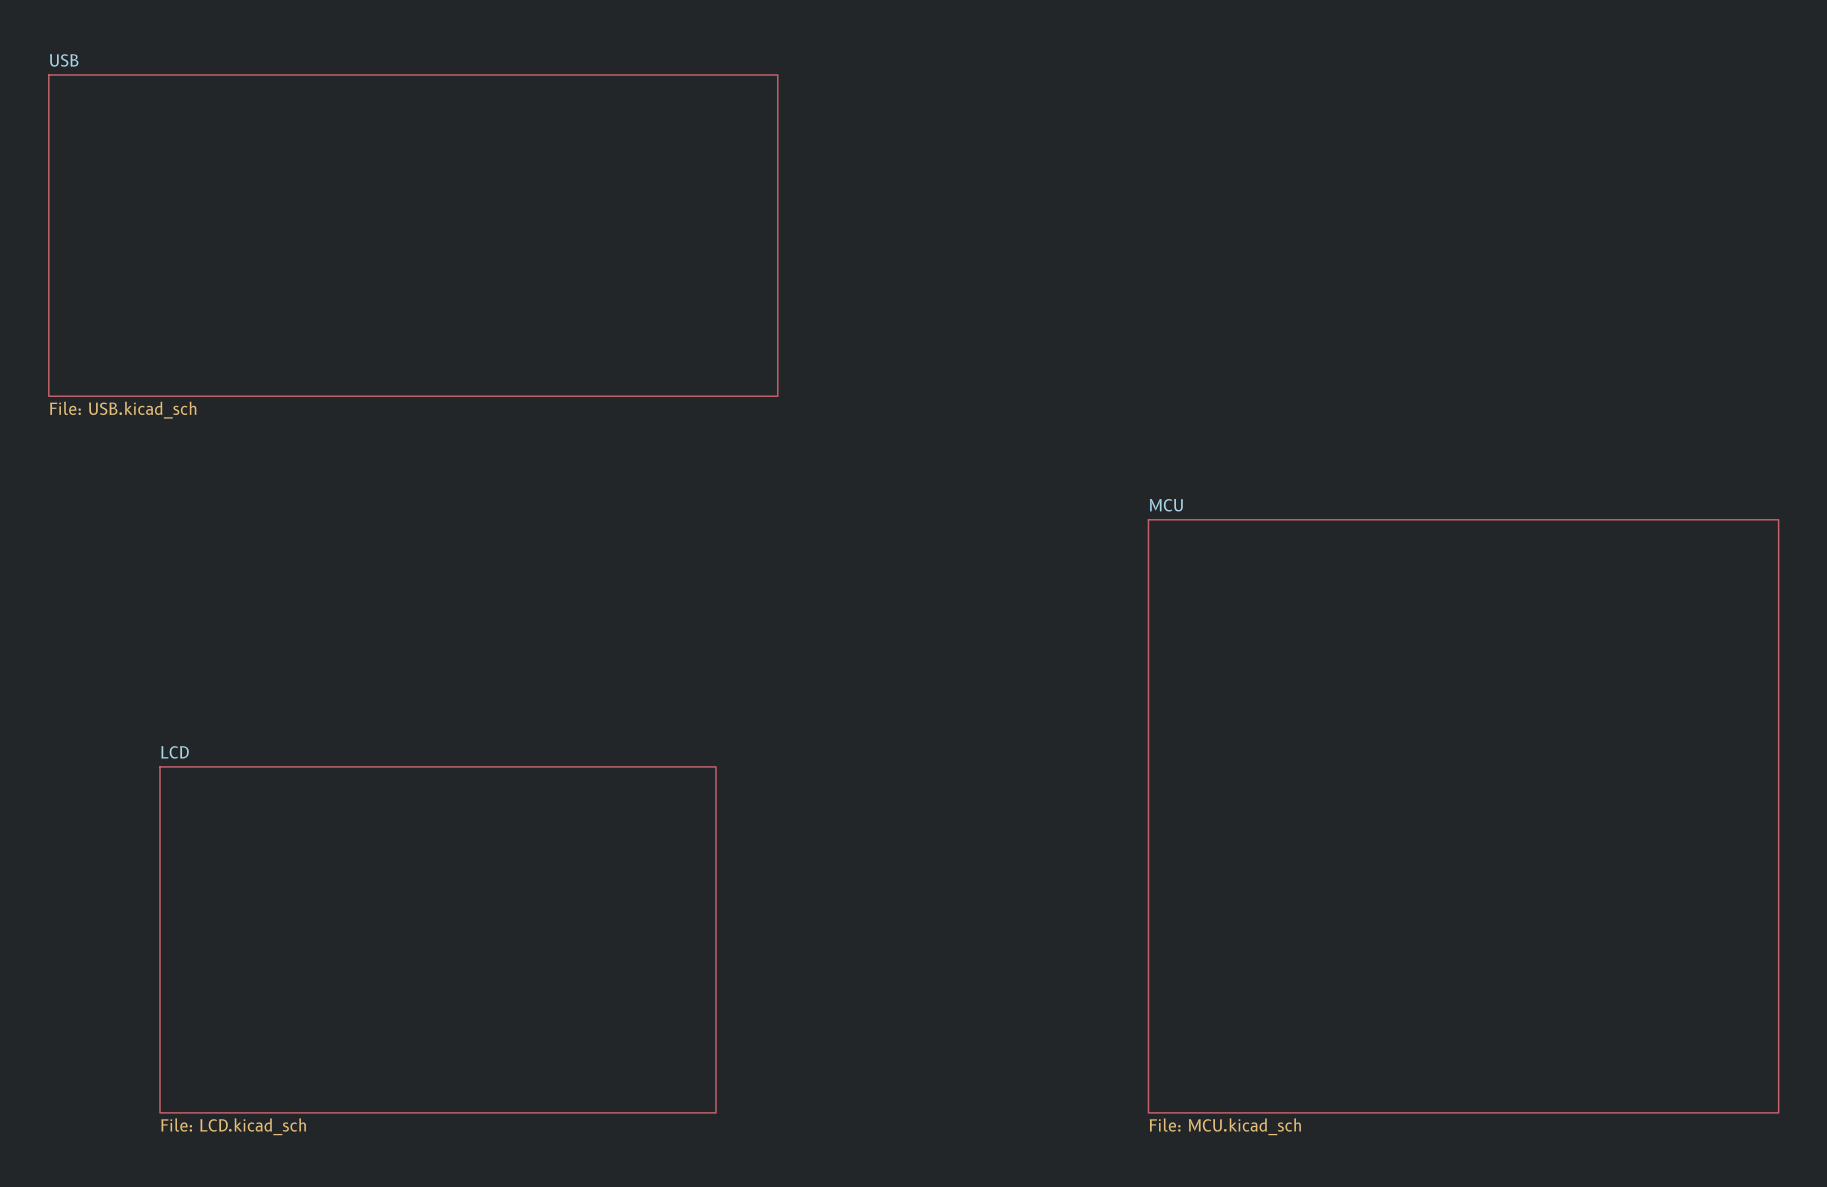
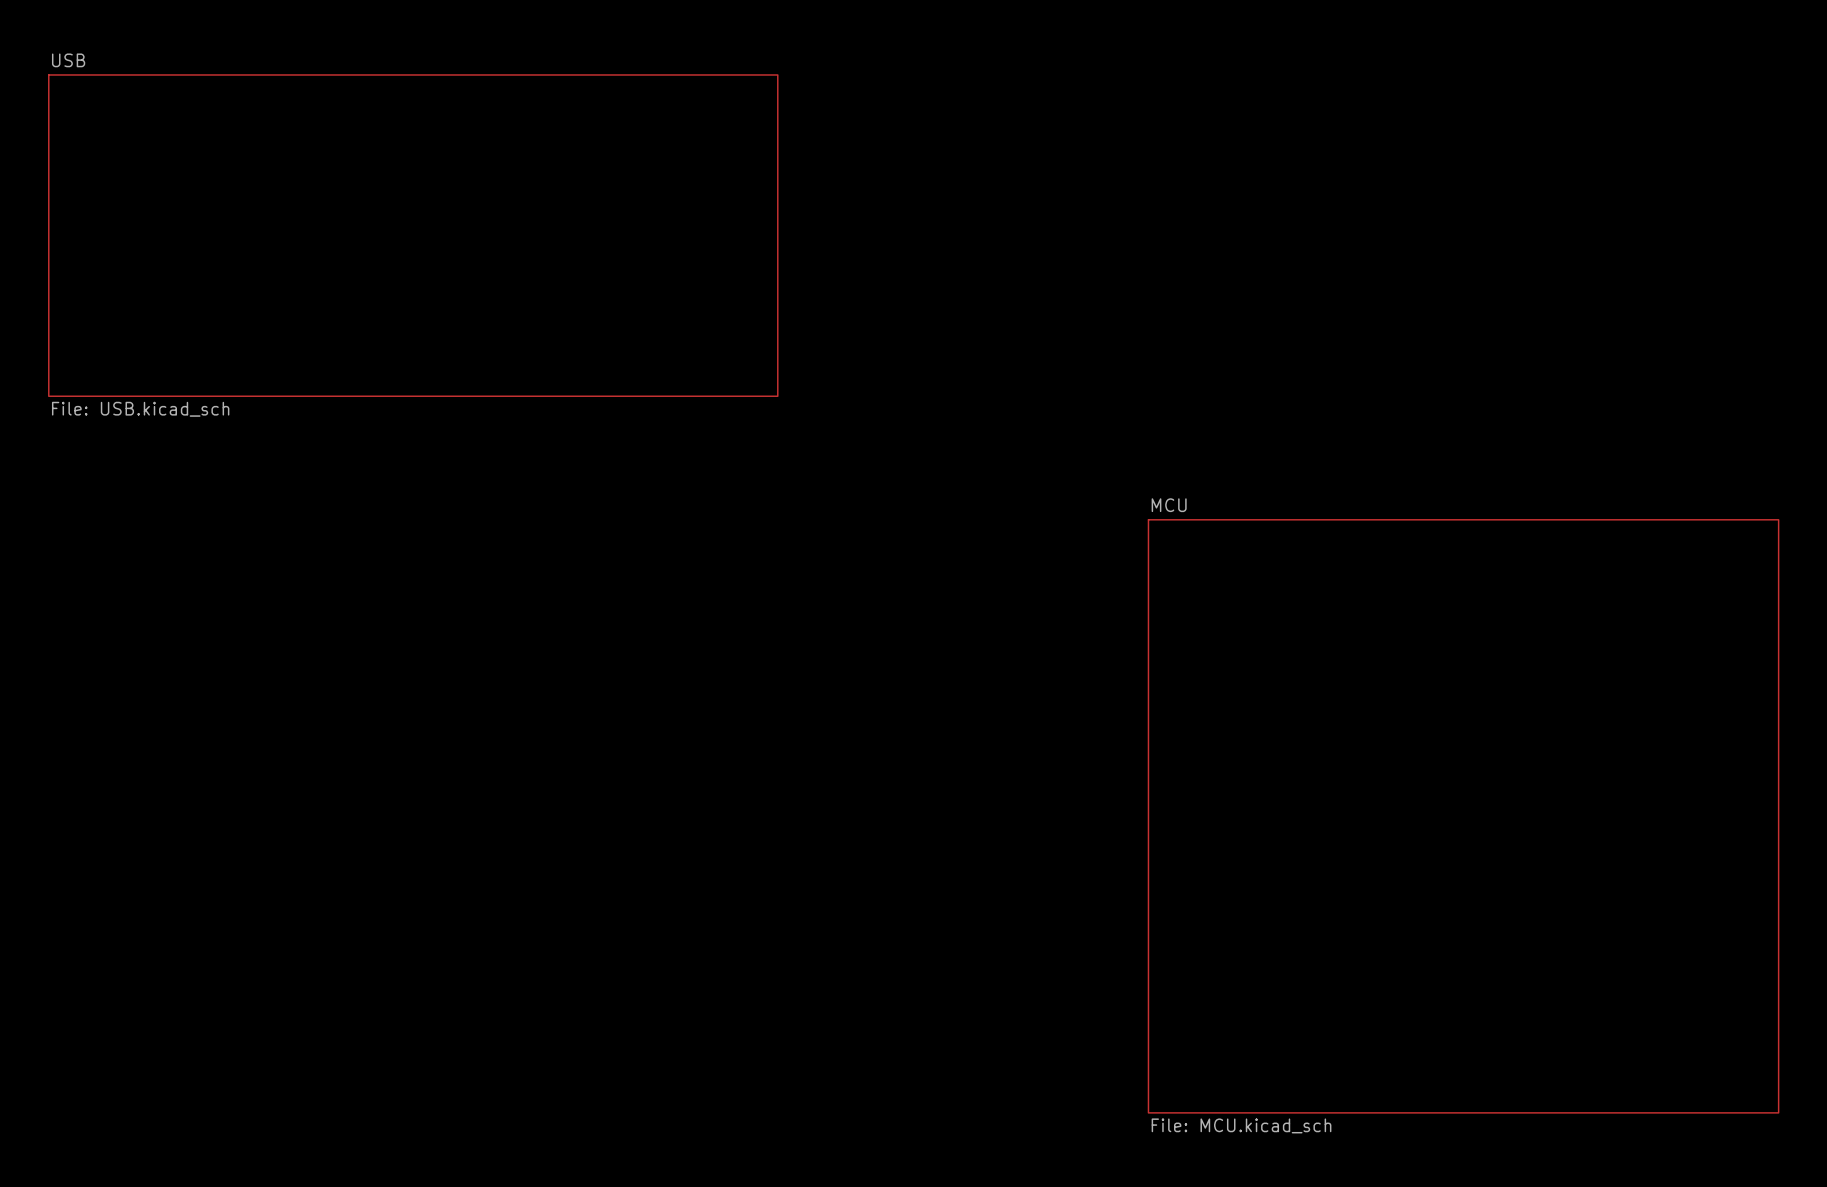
sheet LCD: File: LCD.kicad_sch (438, 939) -> none

